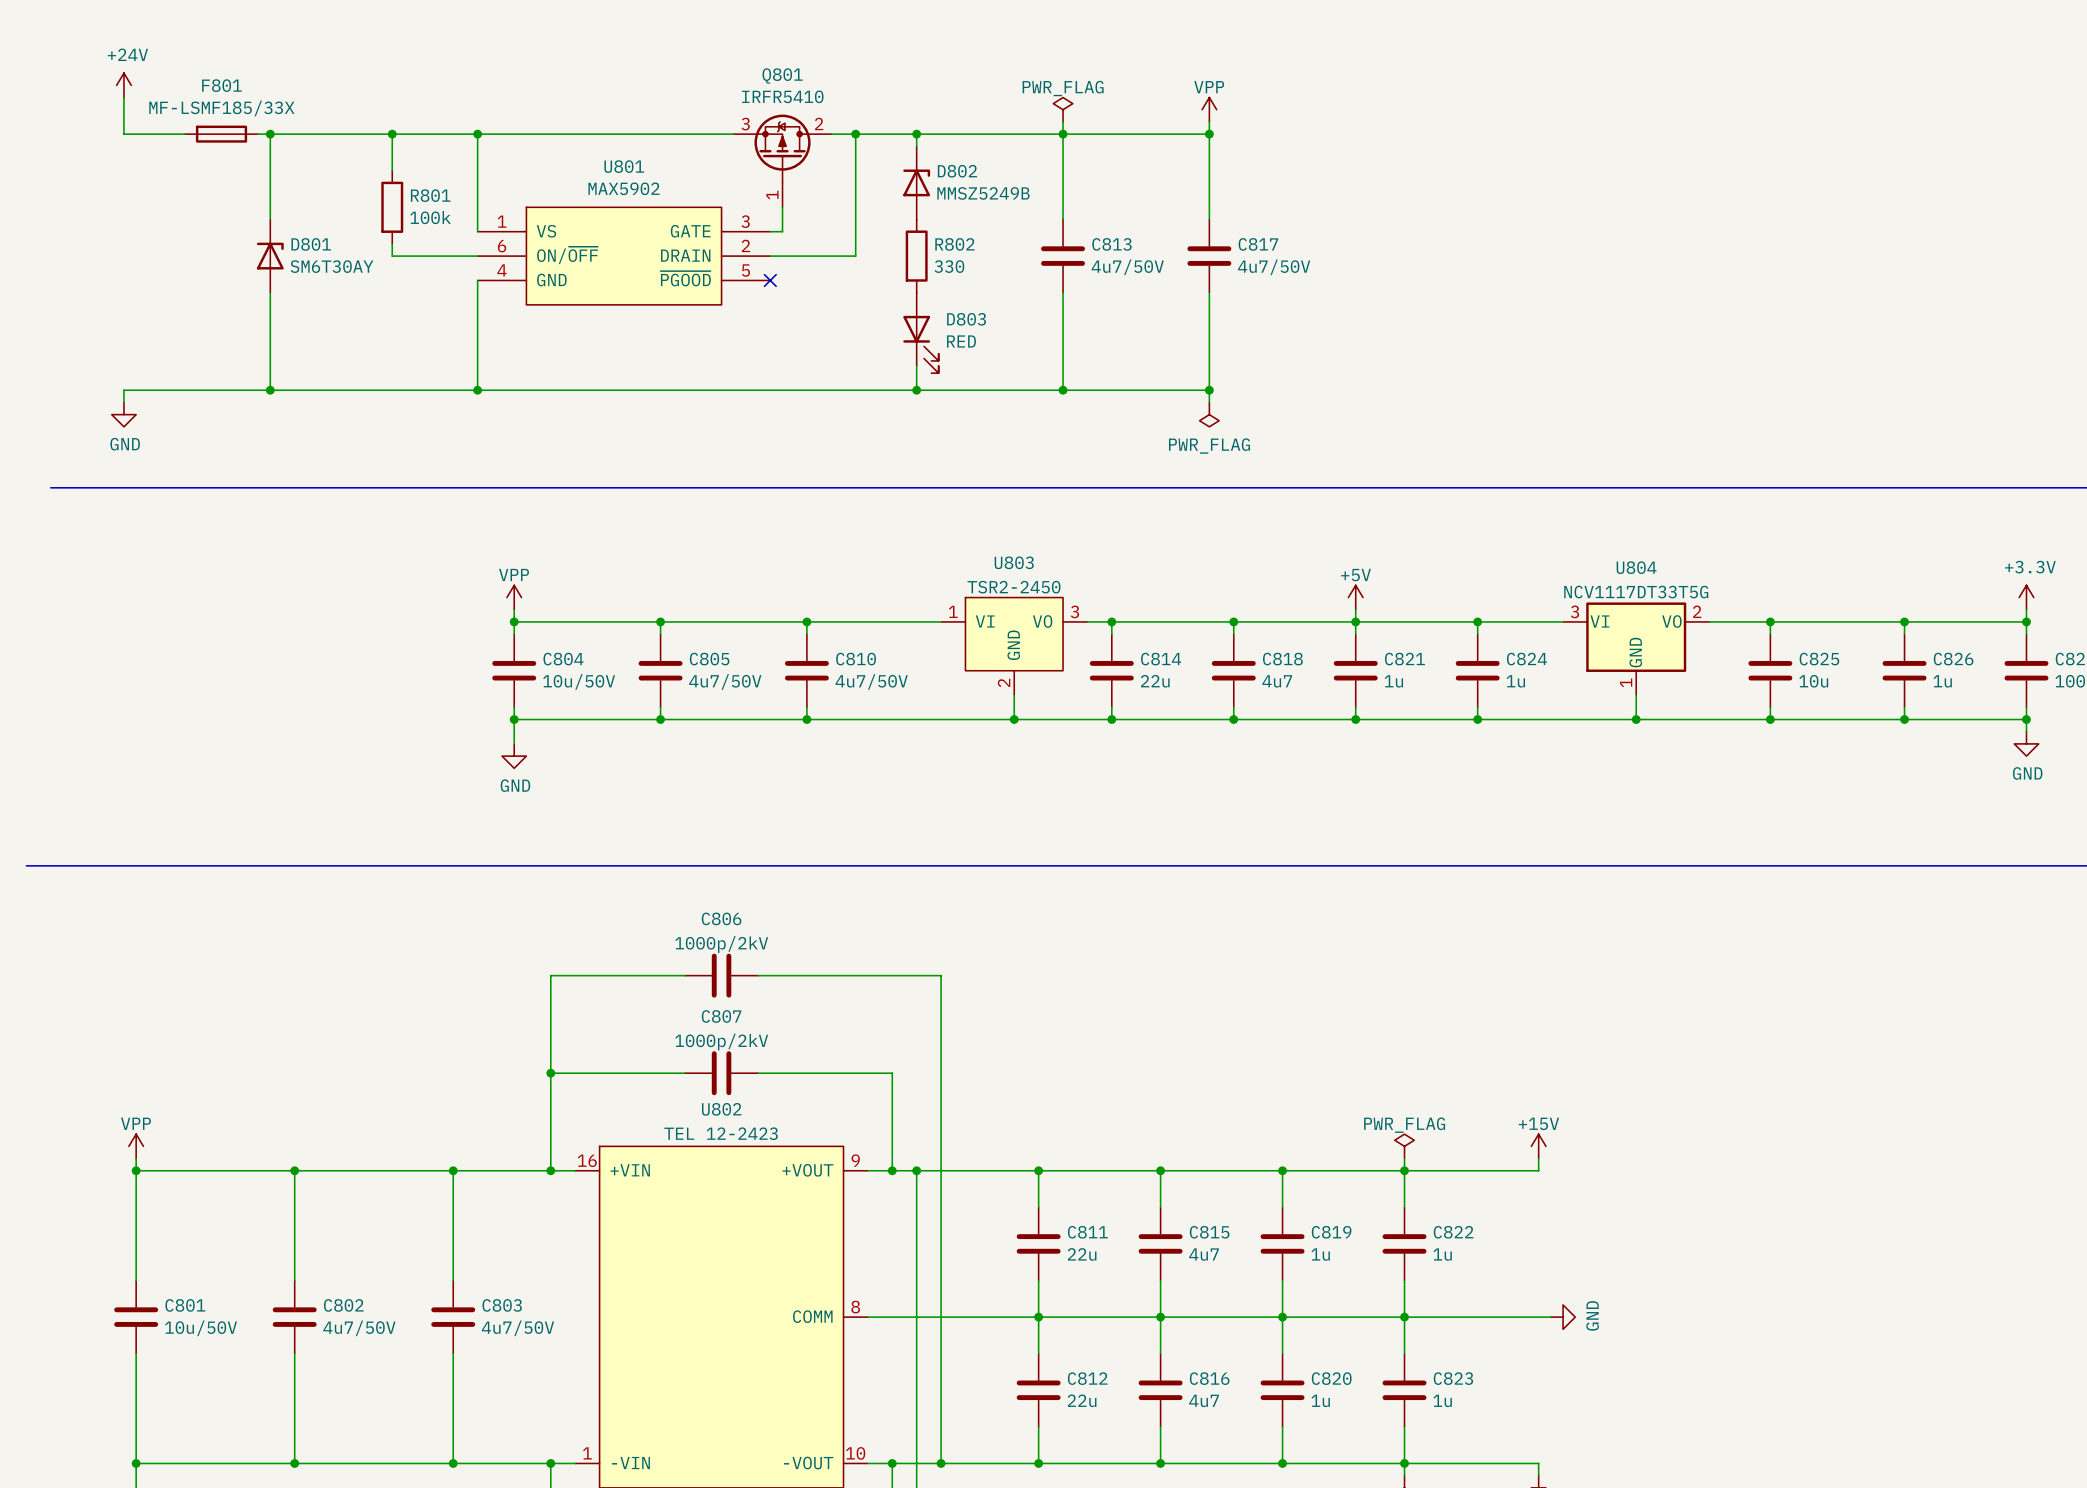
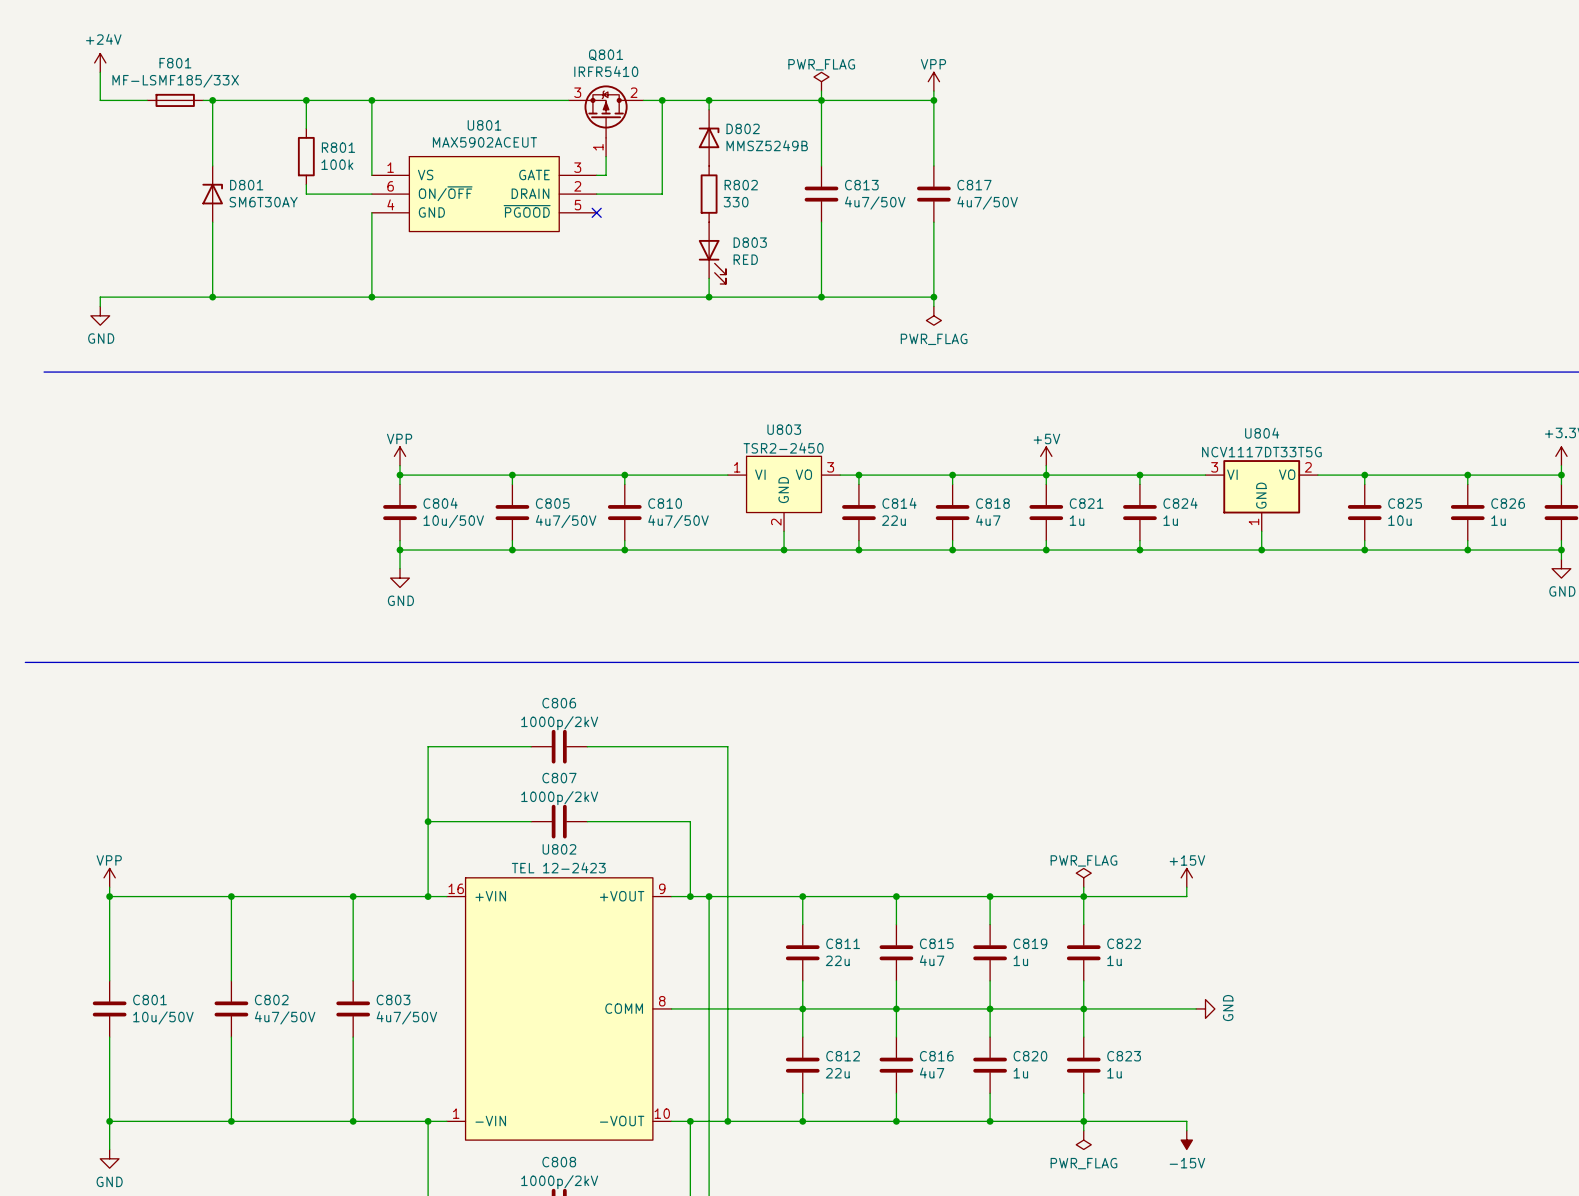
U801 value: MAX5902 (624, 188) -> MAX5902ACEUT (484, 142)

